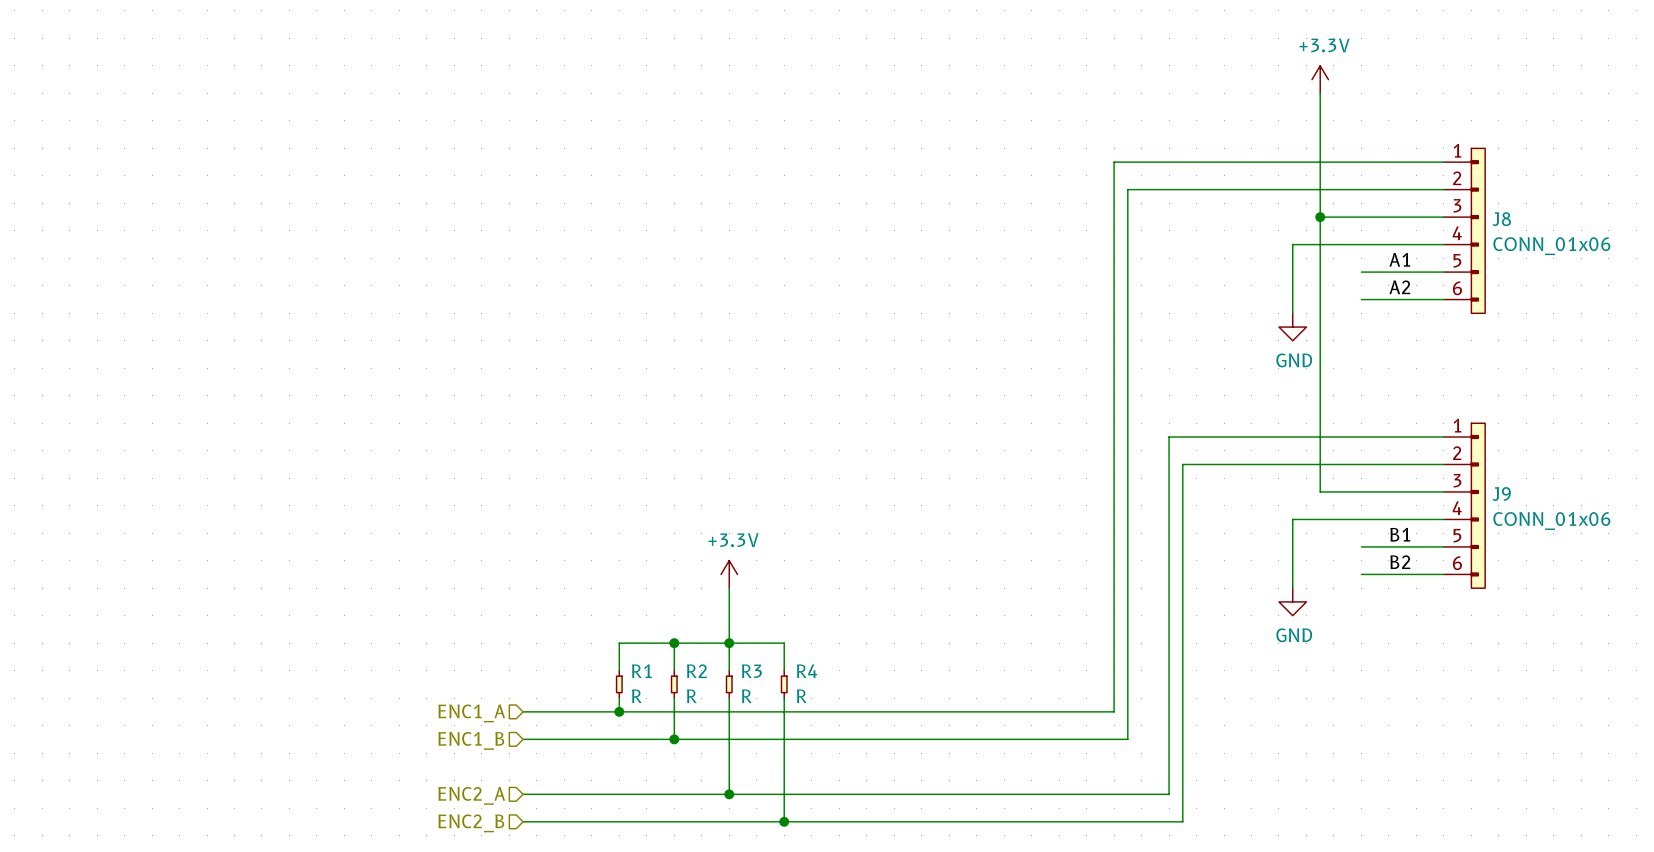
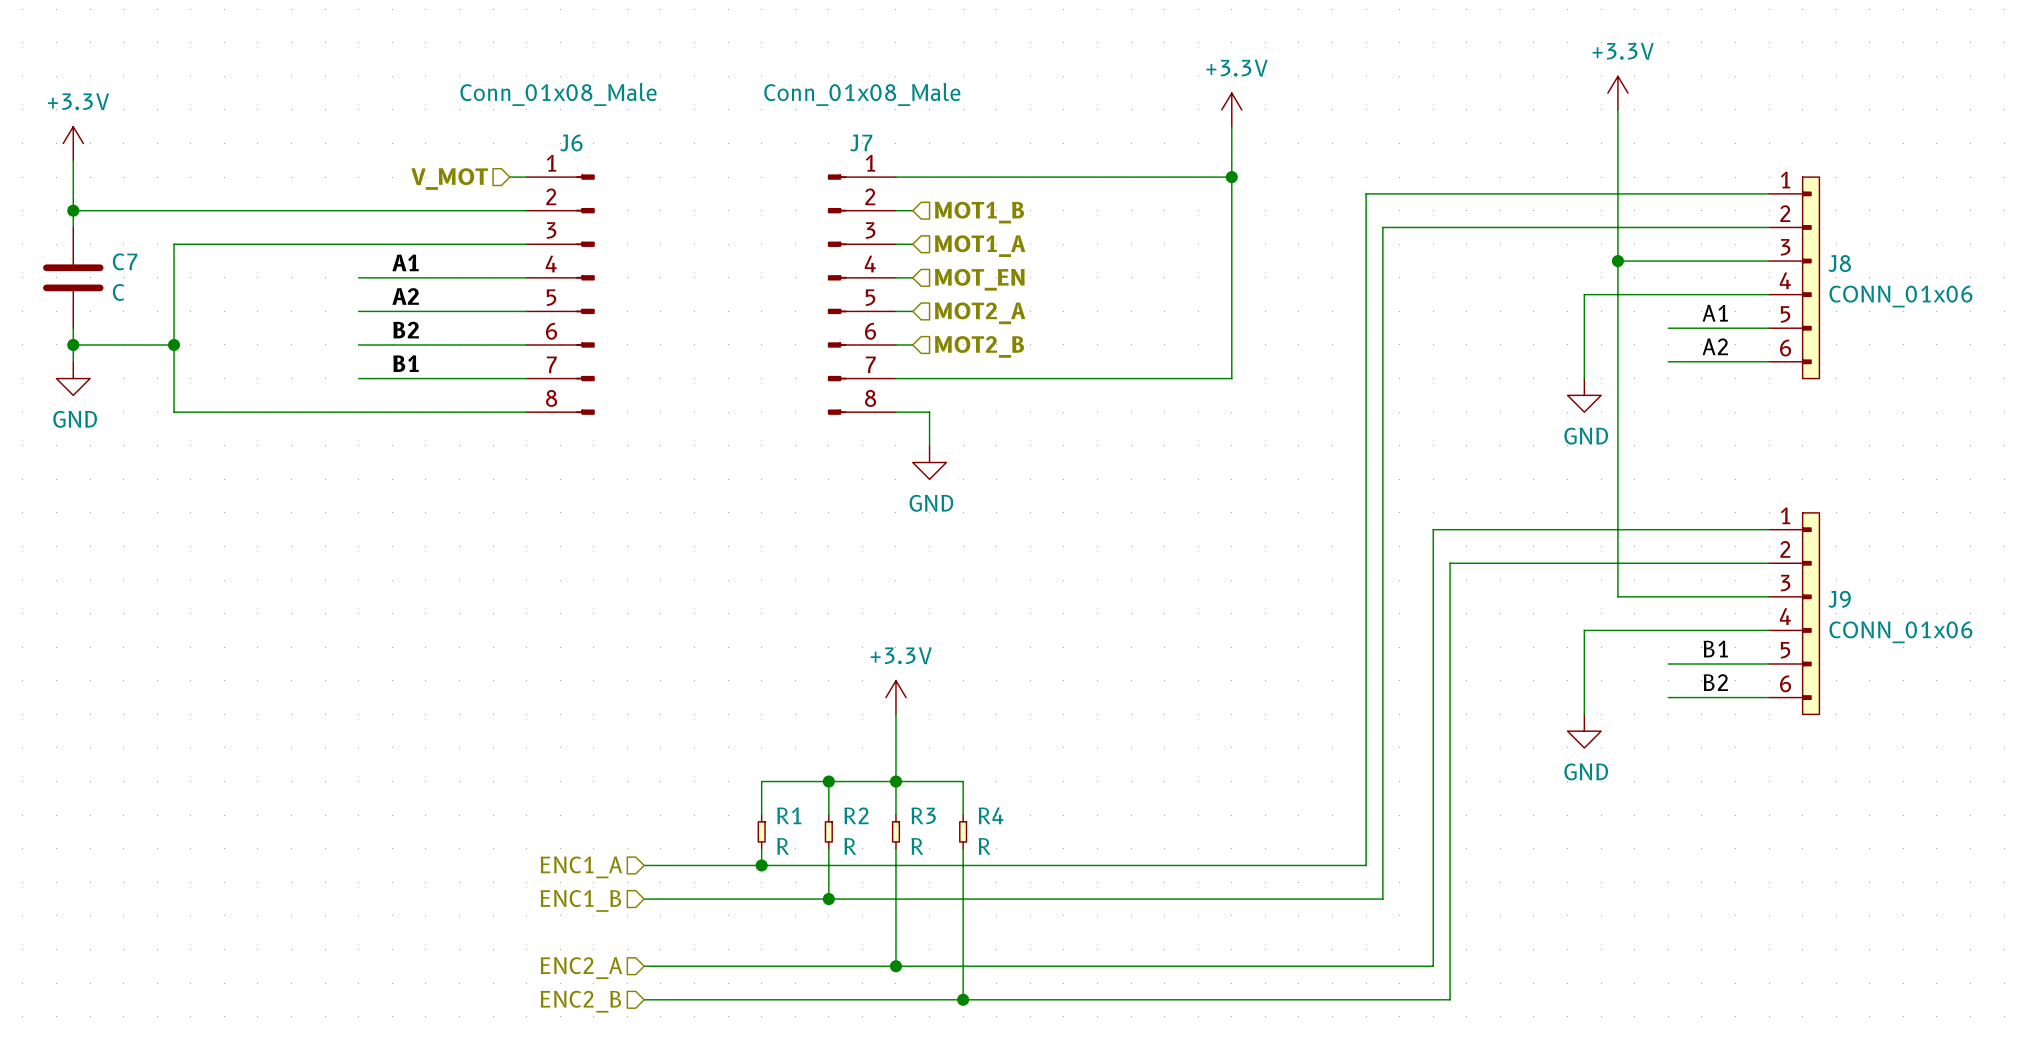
power symbol: none -> +3.3V (1231, 109)
wire: none -> (1231, 126) (1231, 378) (895, 378)
power symbol: none -> +3.3V (73, 143)
wire: none -> (73, 160) (73, 227)
wire: none -> (509, 177) (526, 177)
wire: none -> (895, 177) (1231, 177)
junction: none -> (1231, 177)
hierarchical label: none -> V_MOT (449, 178)
wire: none -> (73, 210) (526, 210)
junction: none -> (73, 210)
wire: none -> (895, 210) (912, 210)
hierarchical label: none -> MOT1_B (979, 212)
wire: none -> (526, 244) (174, 244) (174, 412) (526, 412)
wire: none -> (895, 244) (912, 244)
hierarchical label: none -> MOT1_A (980, 246)
label: none -> A1 (405, 262)
C7: none -> C (73, 277)
wire: none -> (358, 277) (526, 277)
wire: none -> (895, 277) (912, 277)
hierarchical label: none -> MOT_EN (979, 279)
J6: none -> Conn_01x08_Male (560, 294)
J7: none -> Conn_01x08_Male (861, 294)
label: none -> A2 (405, 296)
wire: none -> (358, 311) (526, 311)
wire: none -> (895, 311) (912, 311)
hierarchical label: none -> MOT2_A (980, 313)
wire: none -> (73, 328) (73, 361)
label: none -> B2 (406, 330)
wire: none -> (73, 344) (174, 344)
junction: none -> (73, 344)
junction: none -> (174, 344)
wire: none -> (358, 344) (526, 344)
wire: none -> (895, 344) (912, 344)
hierarchical label: none -> MOT2_B (979, 346)
label: none -> B1 (405, 363)
power symbol: none -> GND (73, 378)
wire: none -> (358, 378) (526, 378)
wire: none -> (895, 412) (929, 412) (929, 445)
power symbol: none -> GND (929, 462)

